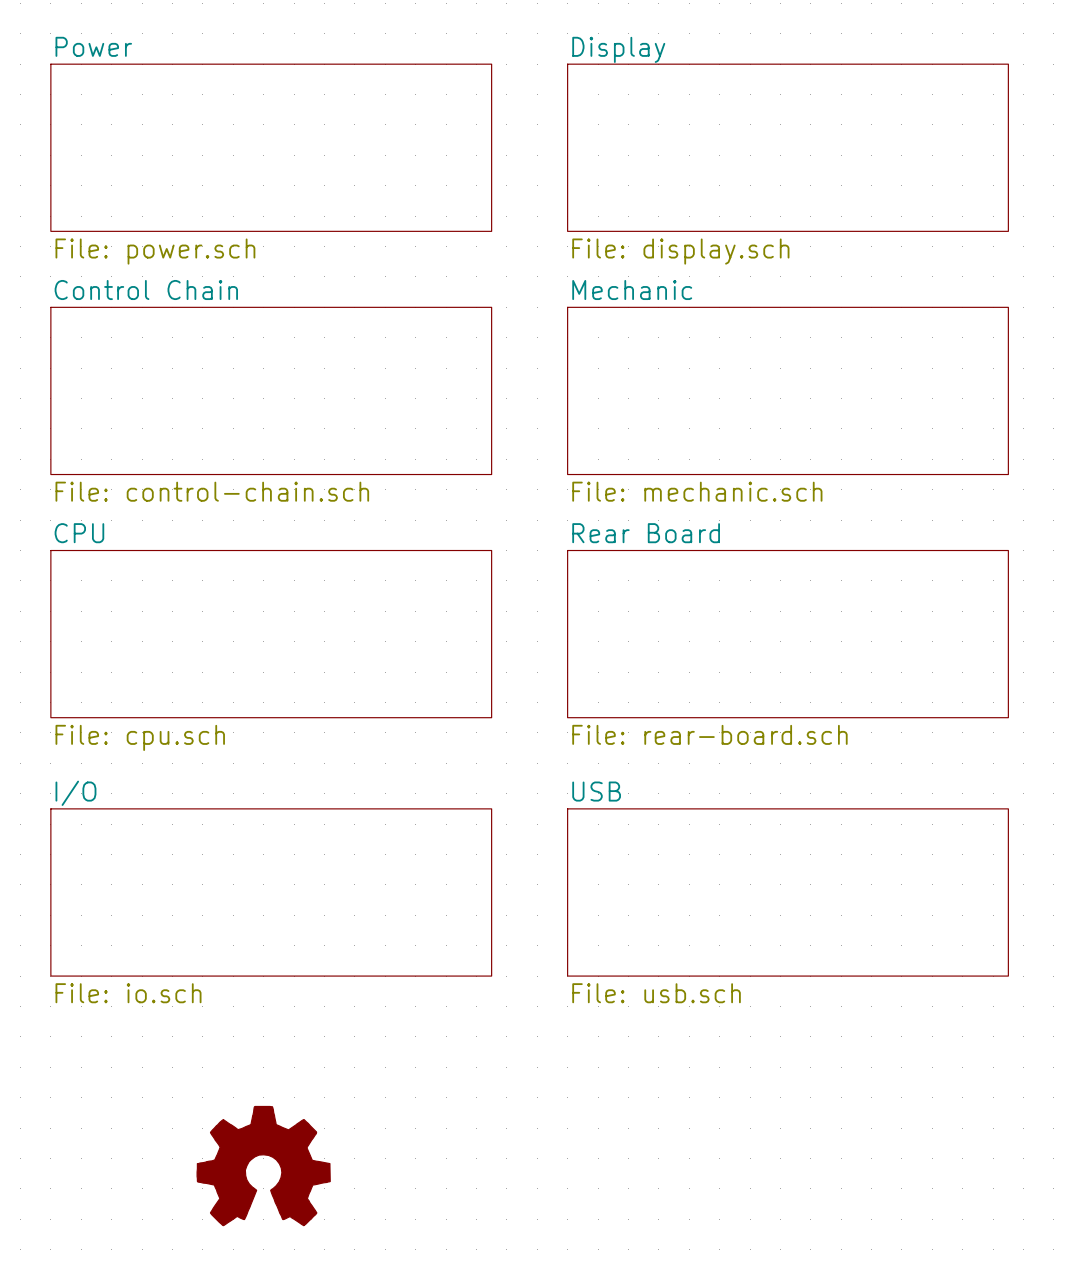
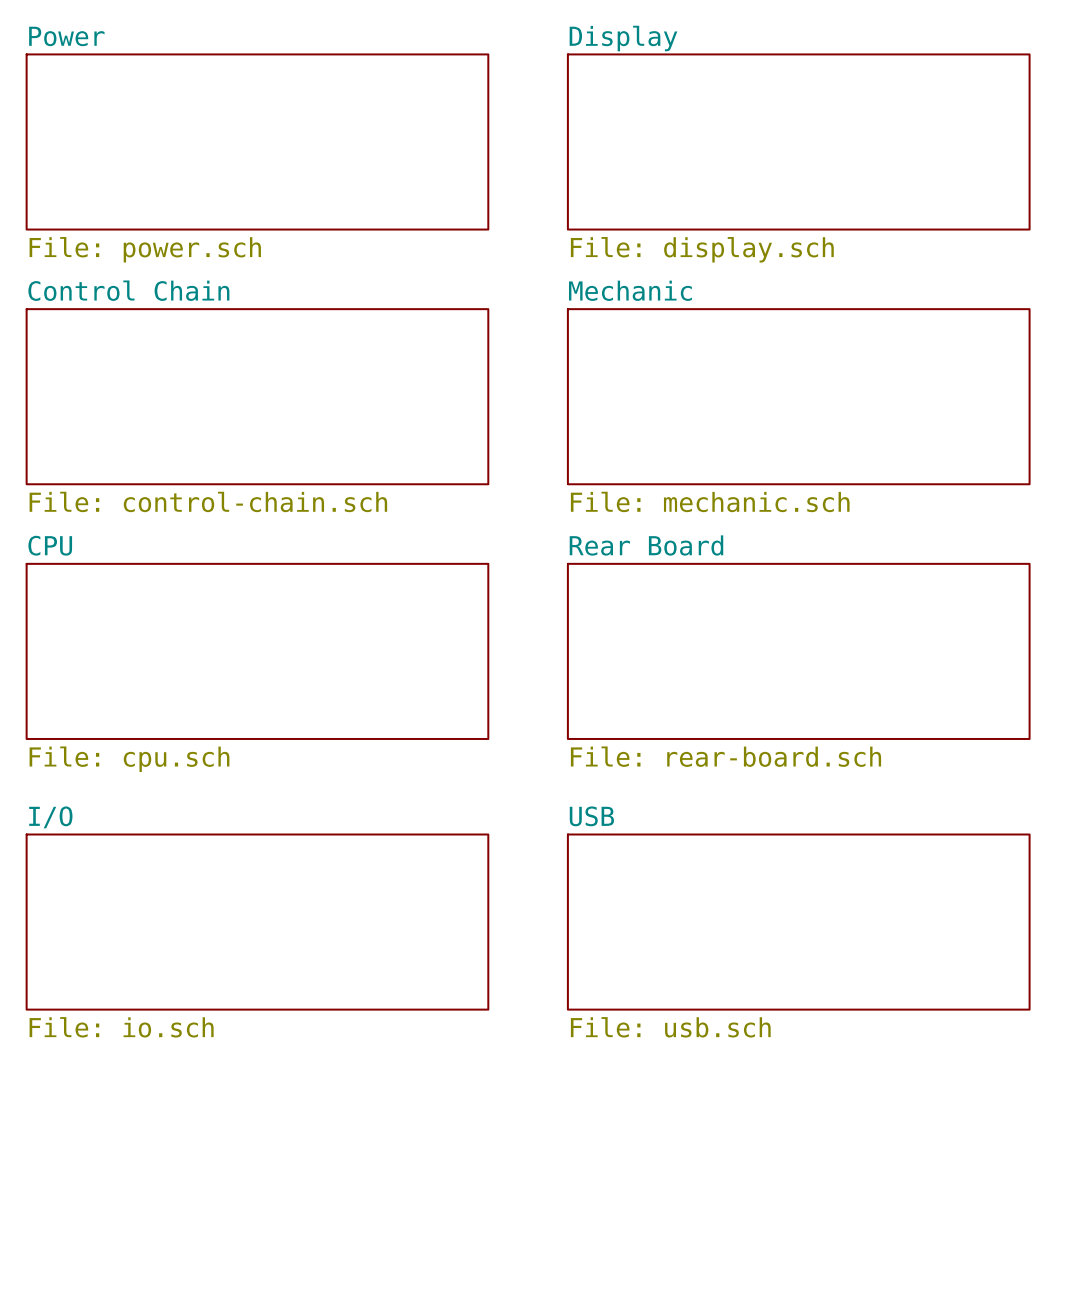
power symbol: (263, 1166) -> none

